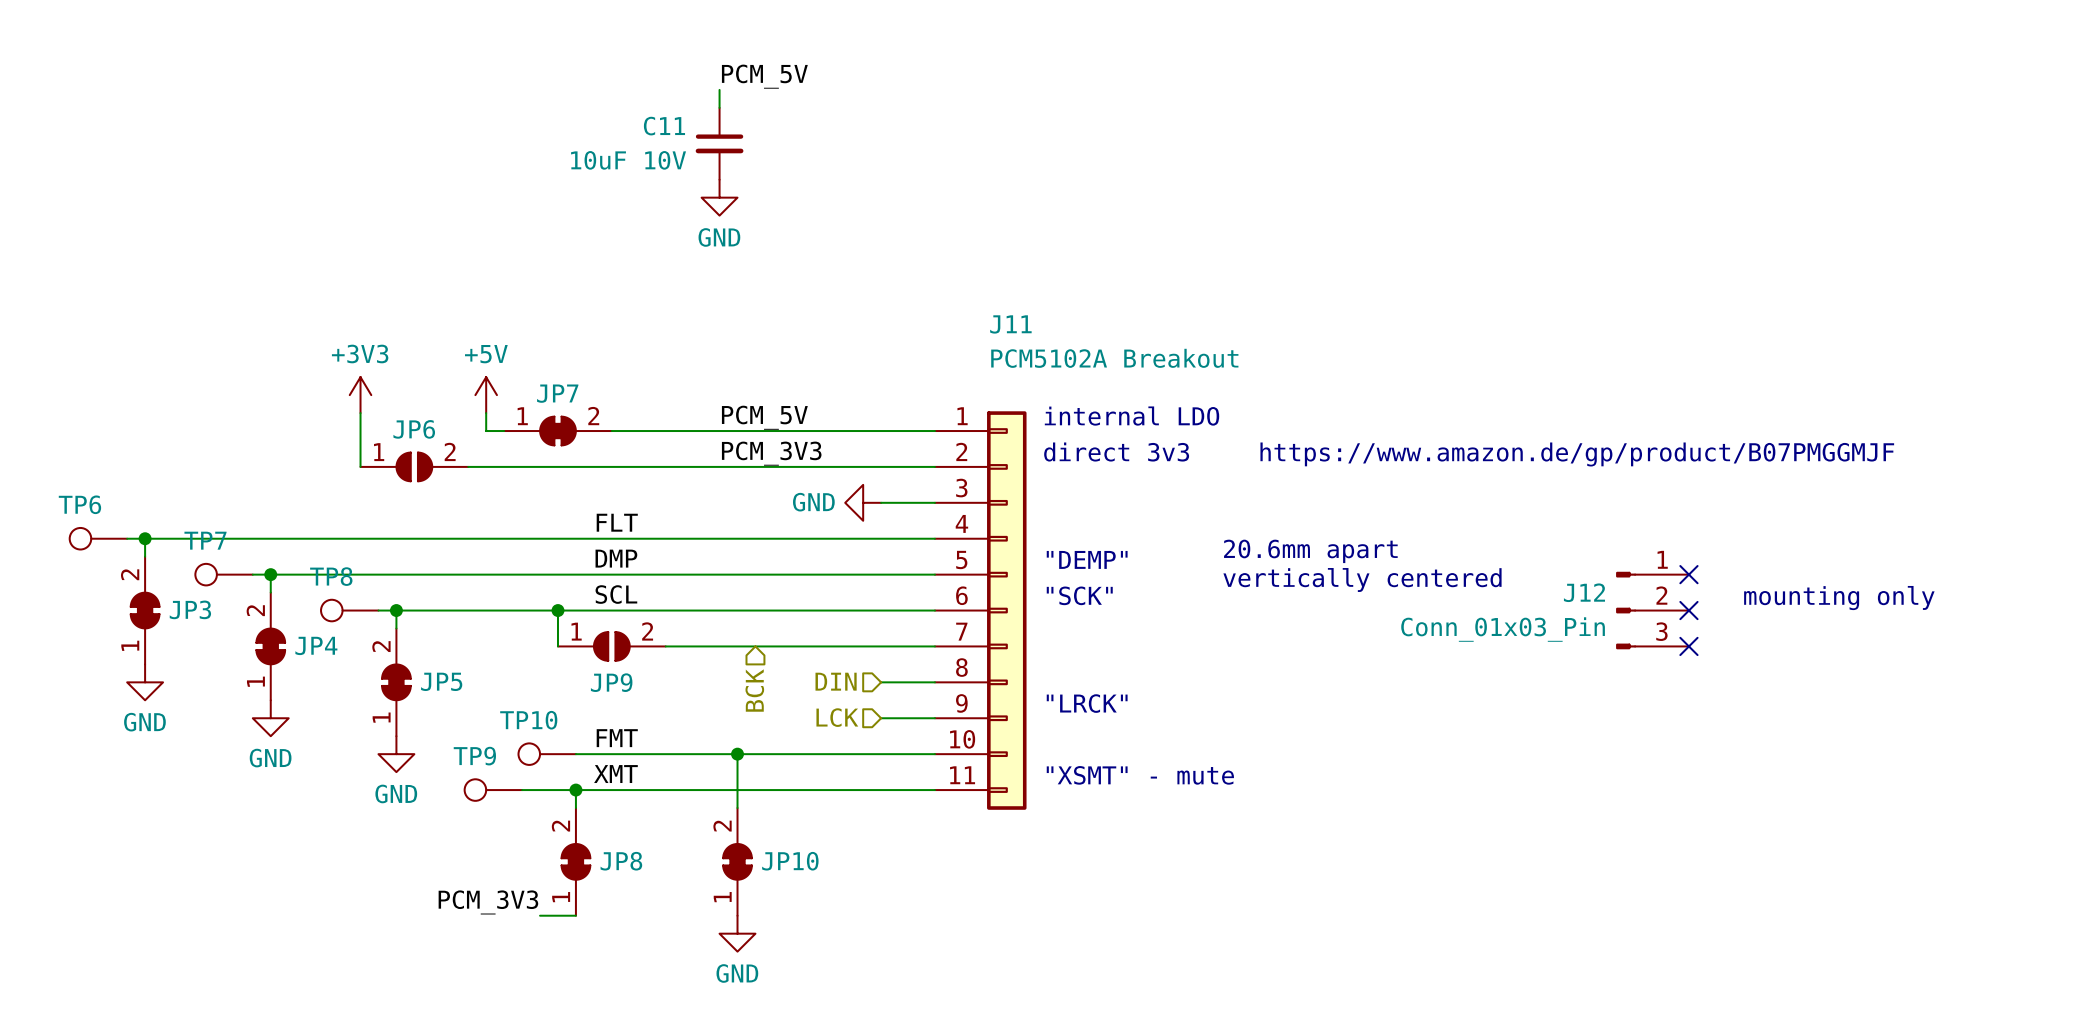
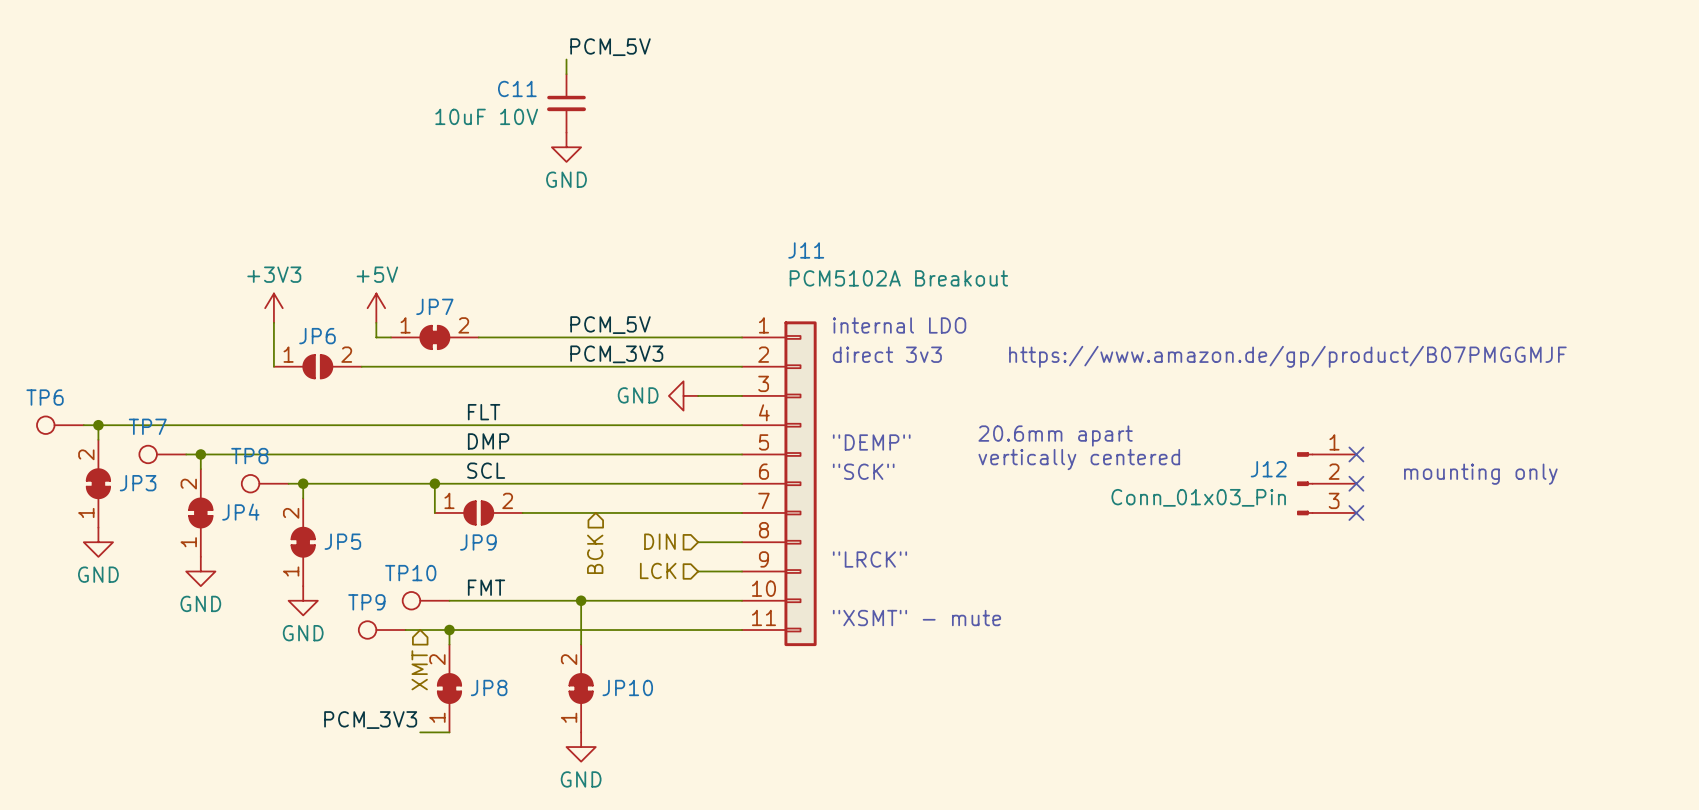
label: XMT (615, 774) -> none
hierarchical label: none -> XMT (419, 670)

